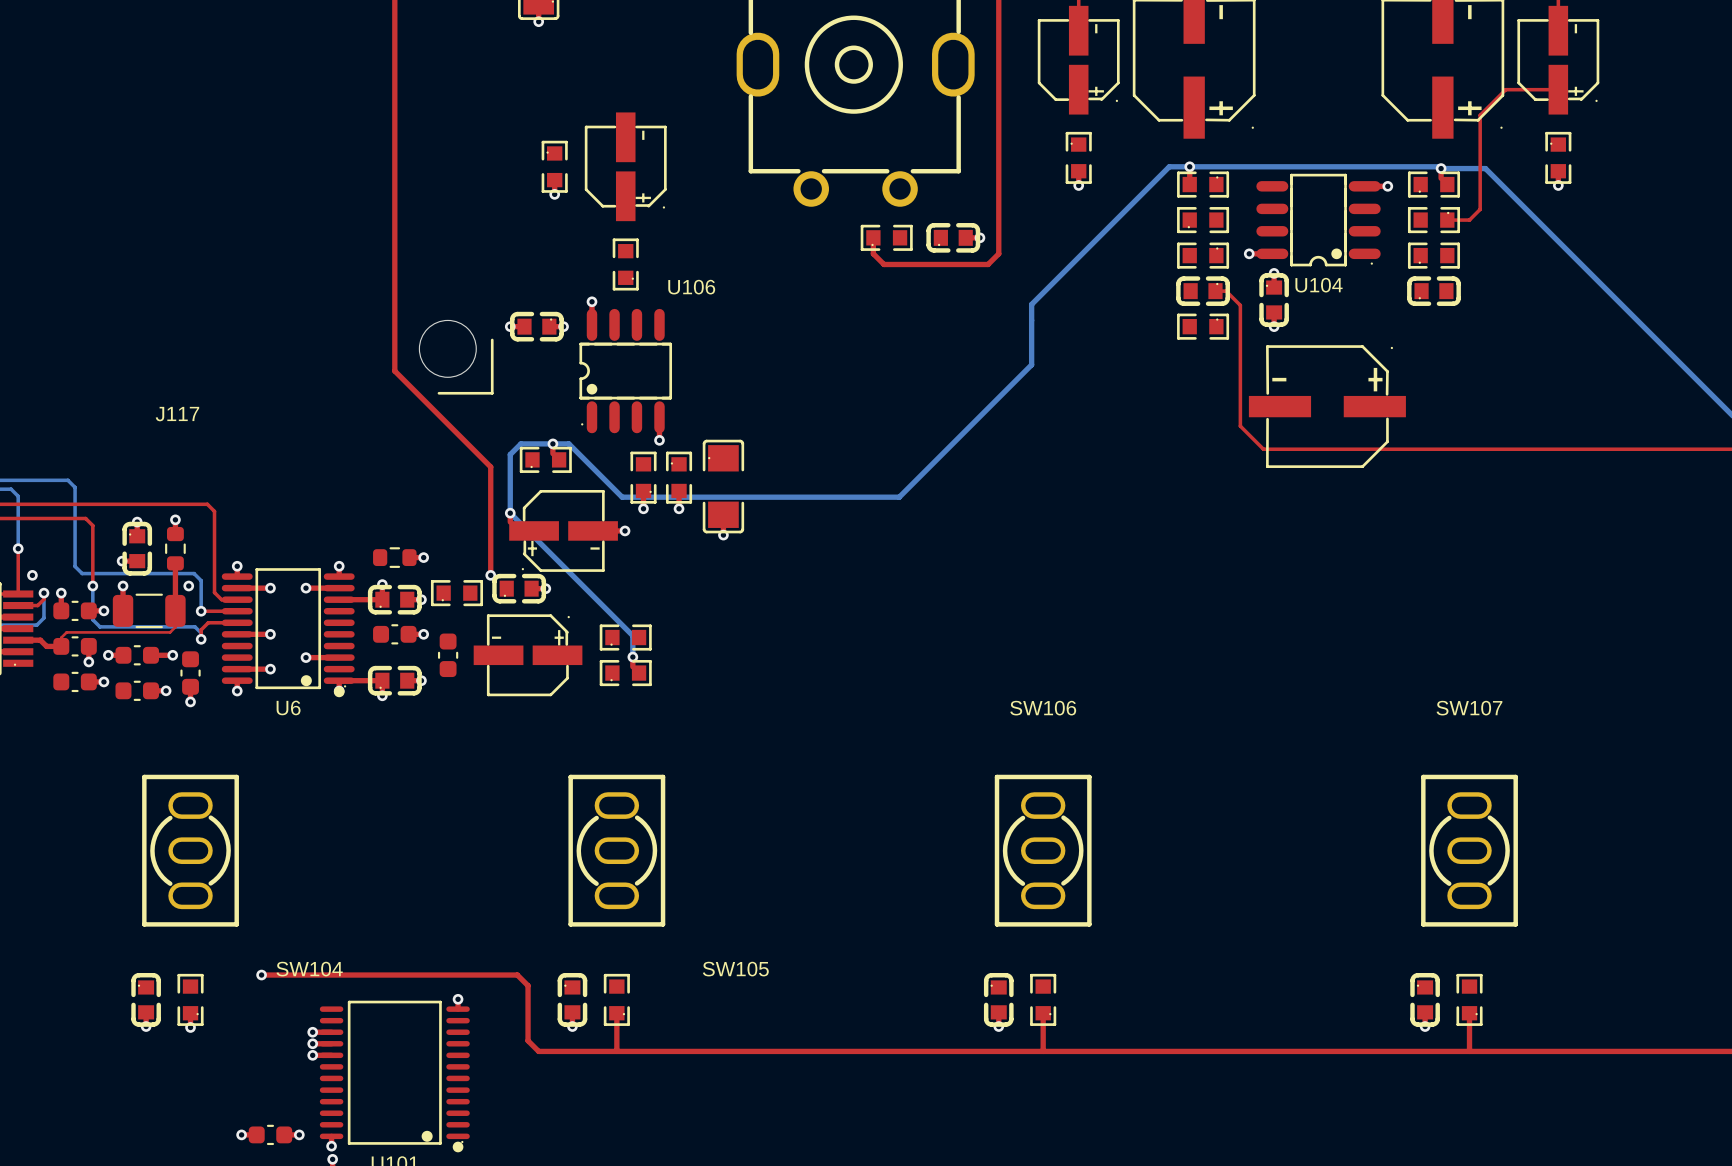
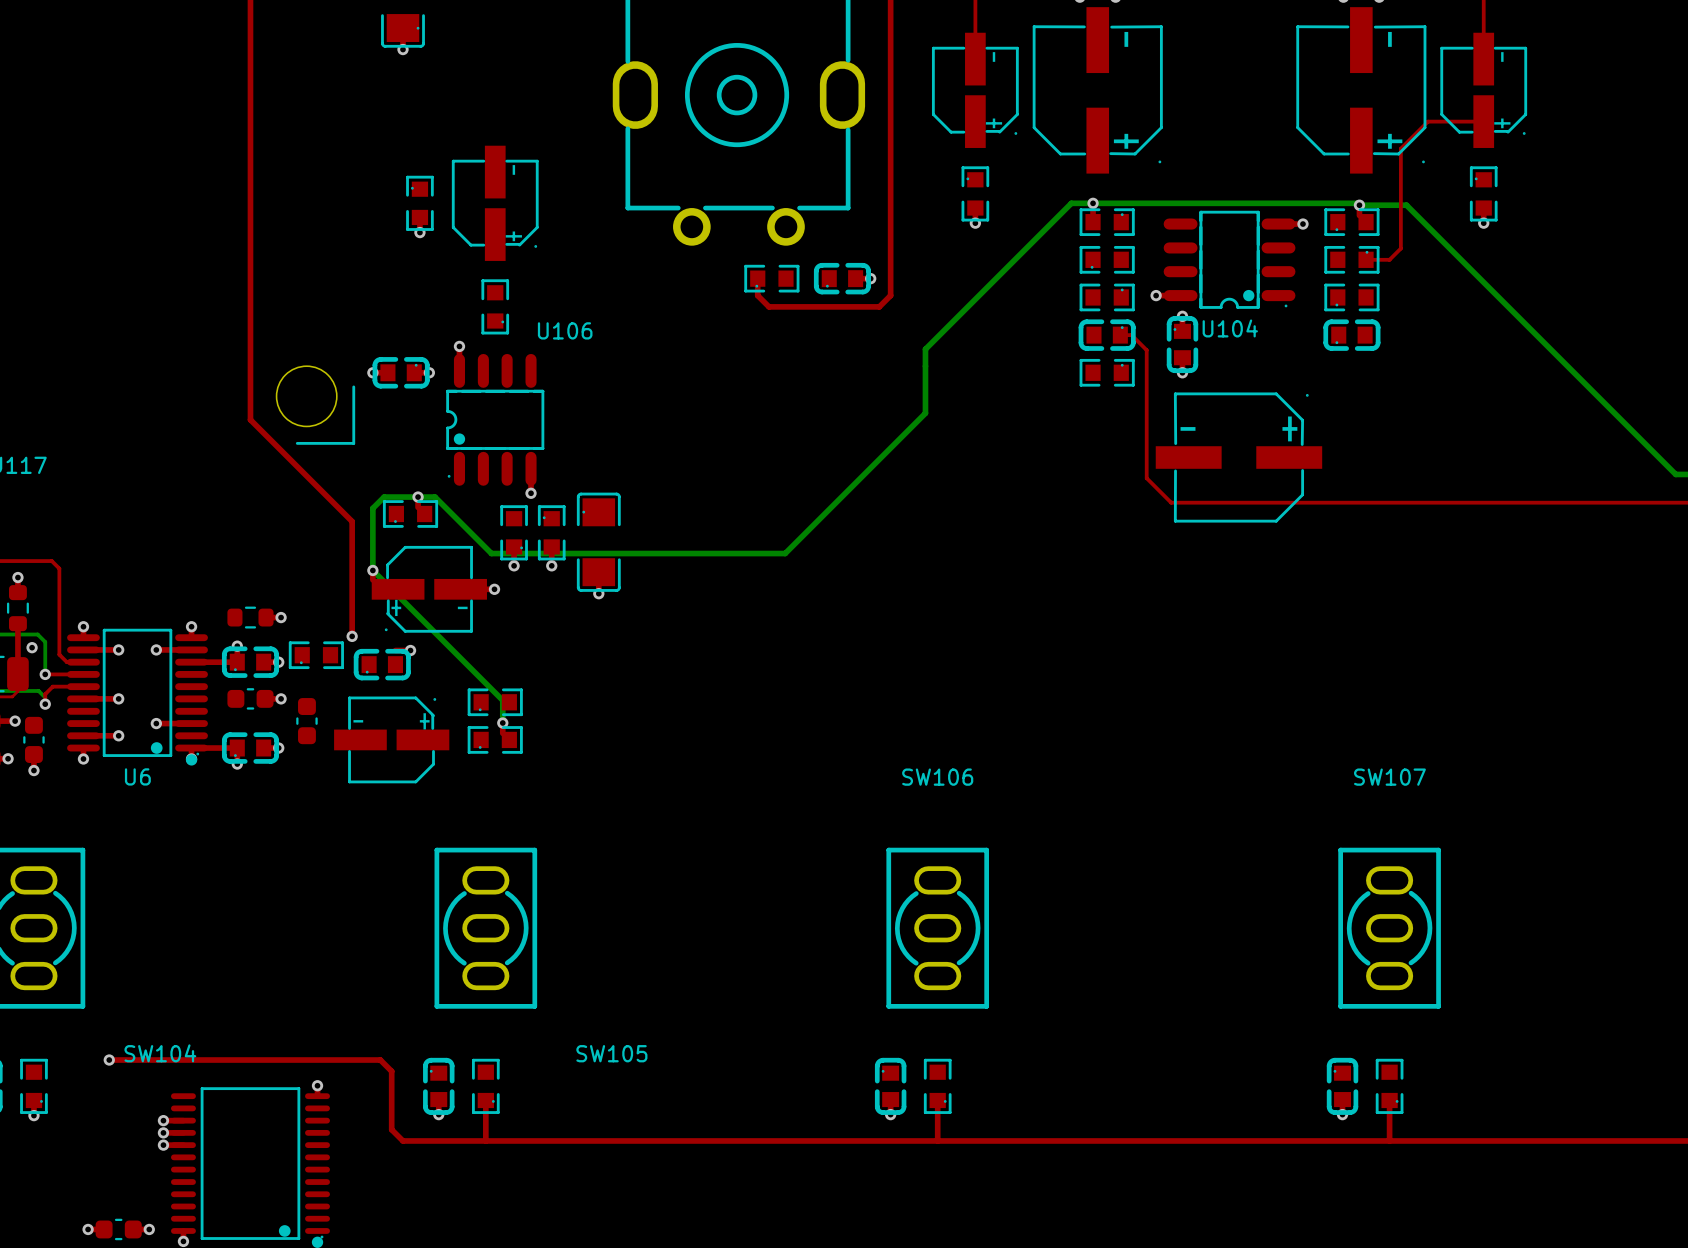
part position: (519, 588) -> (382, 664)
part position: (528, 655) -> (391, 739)

